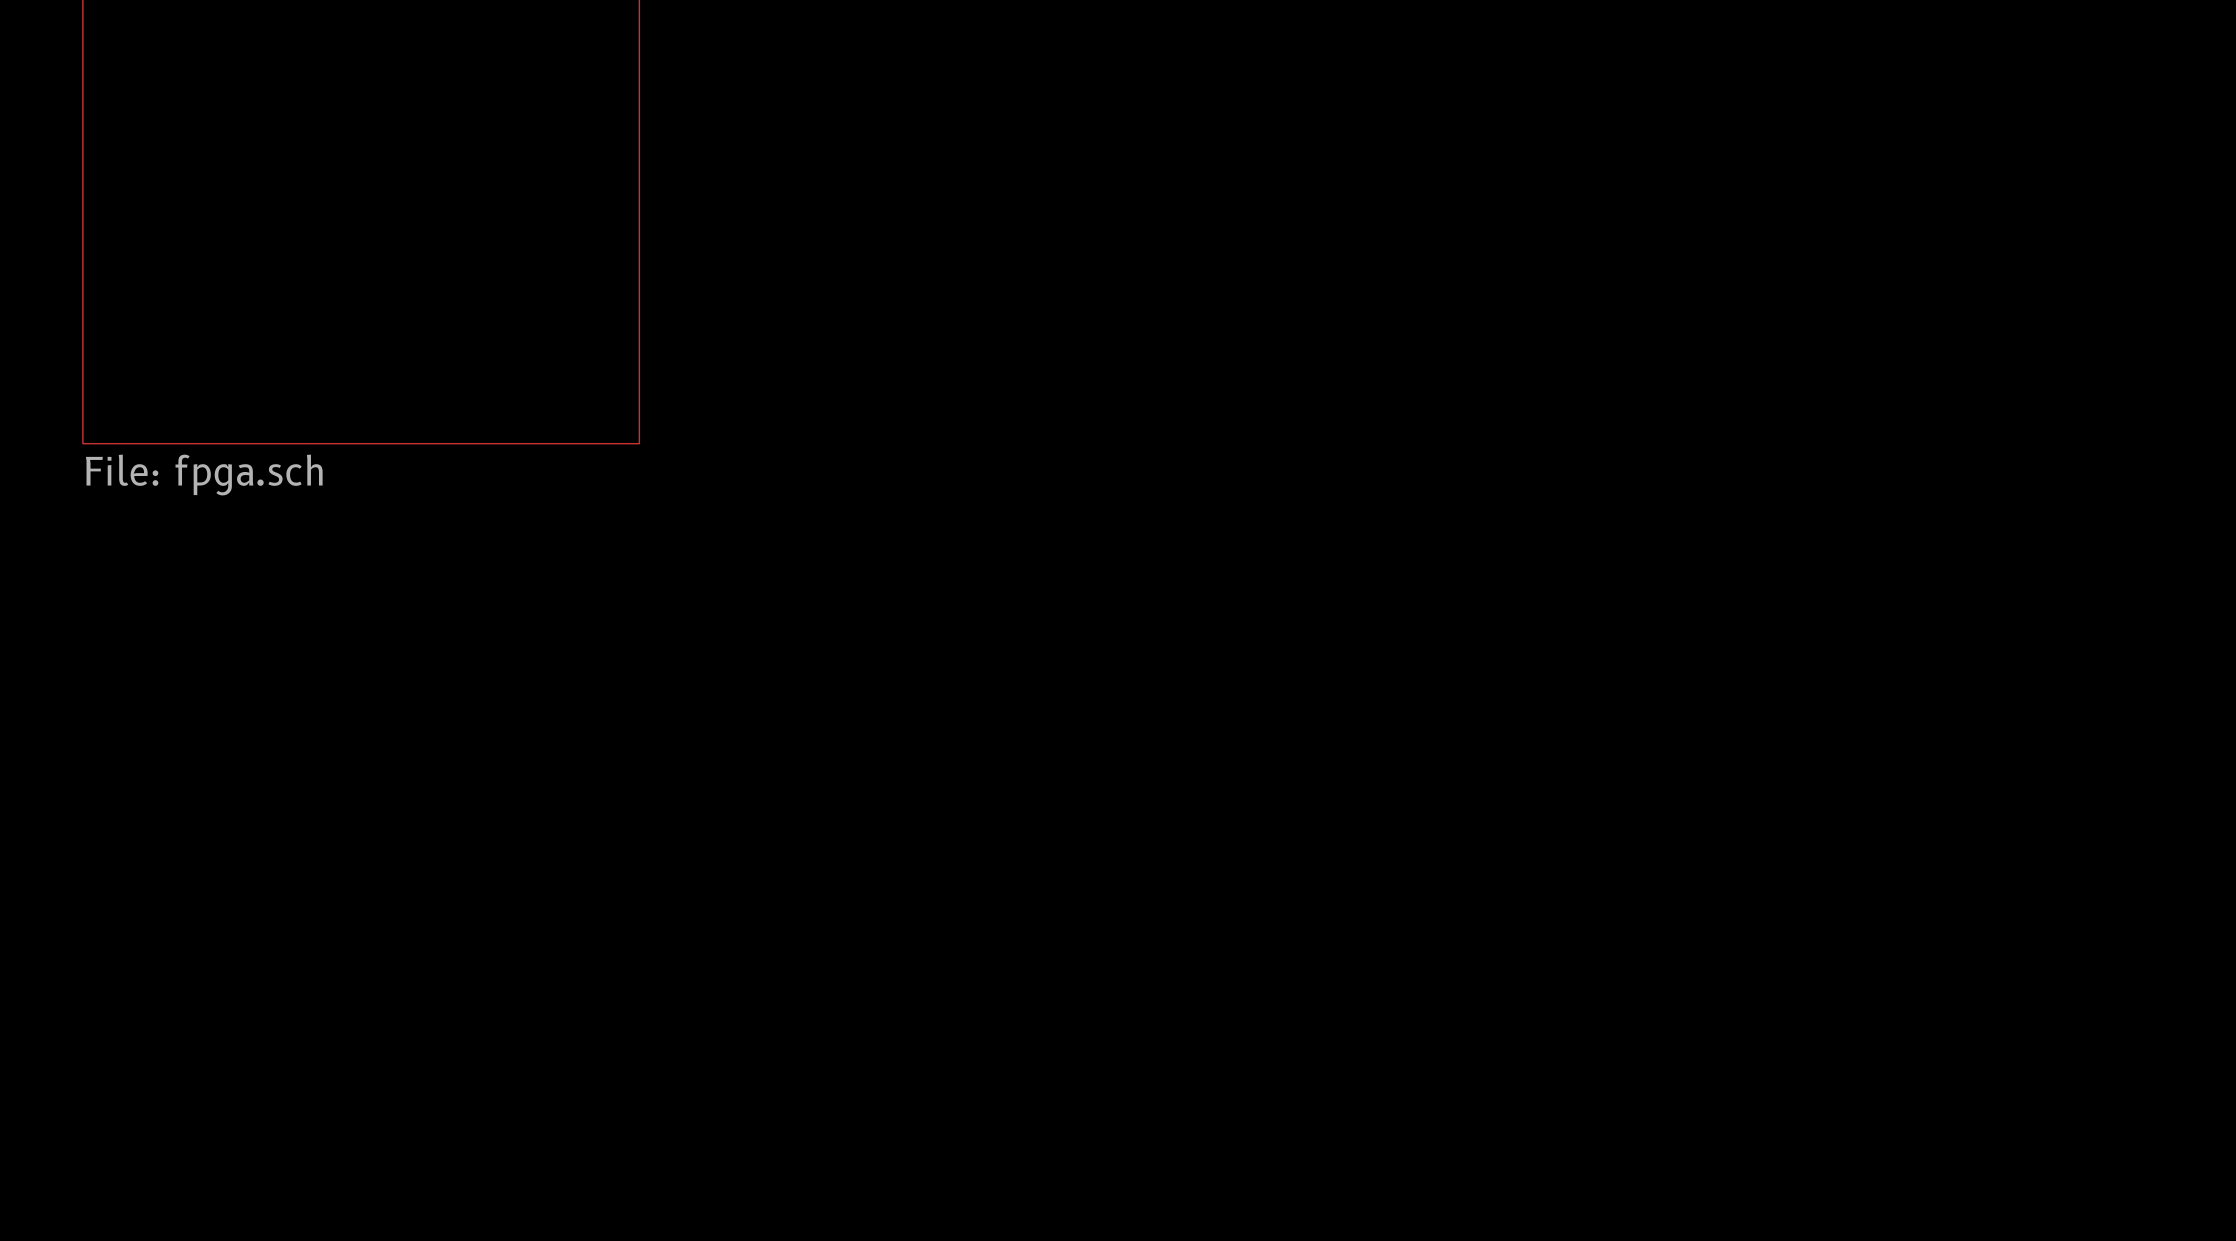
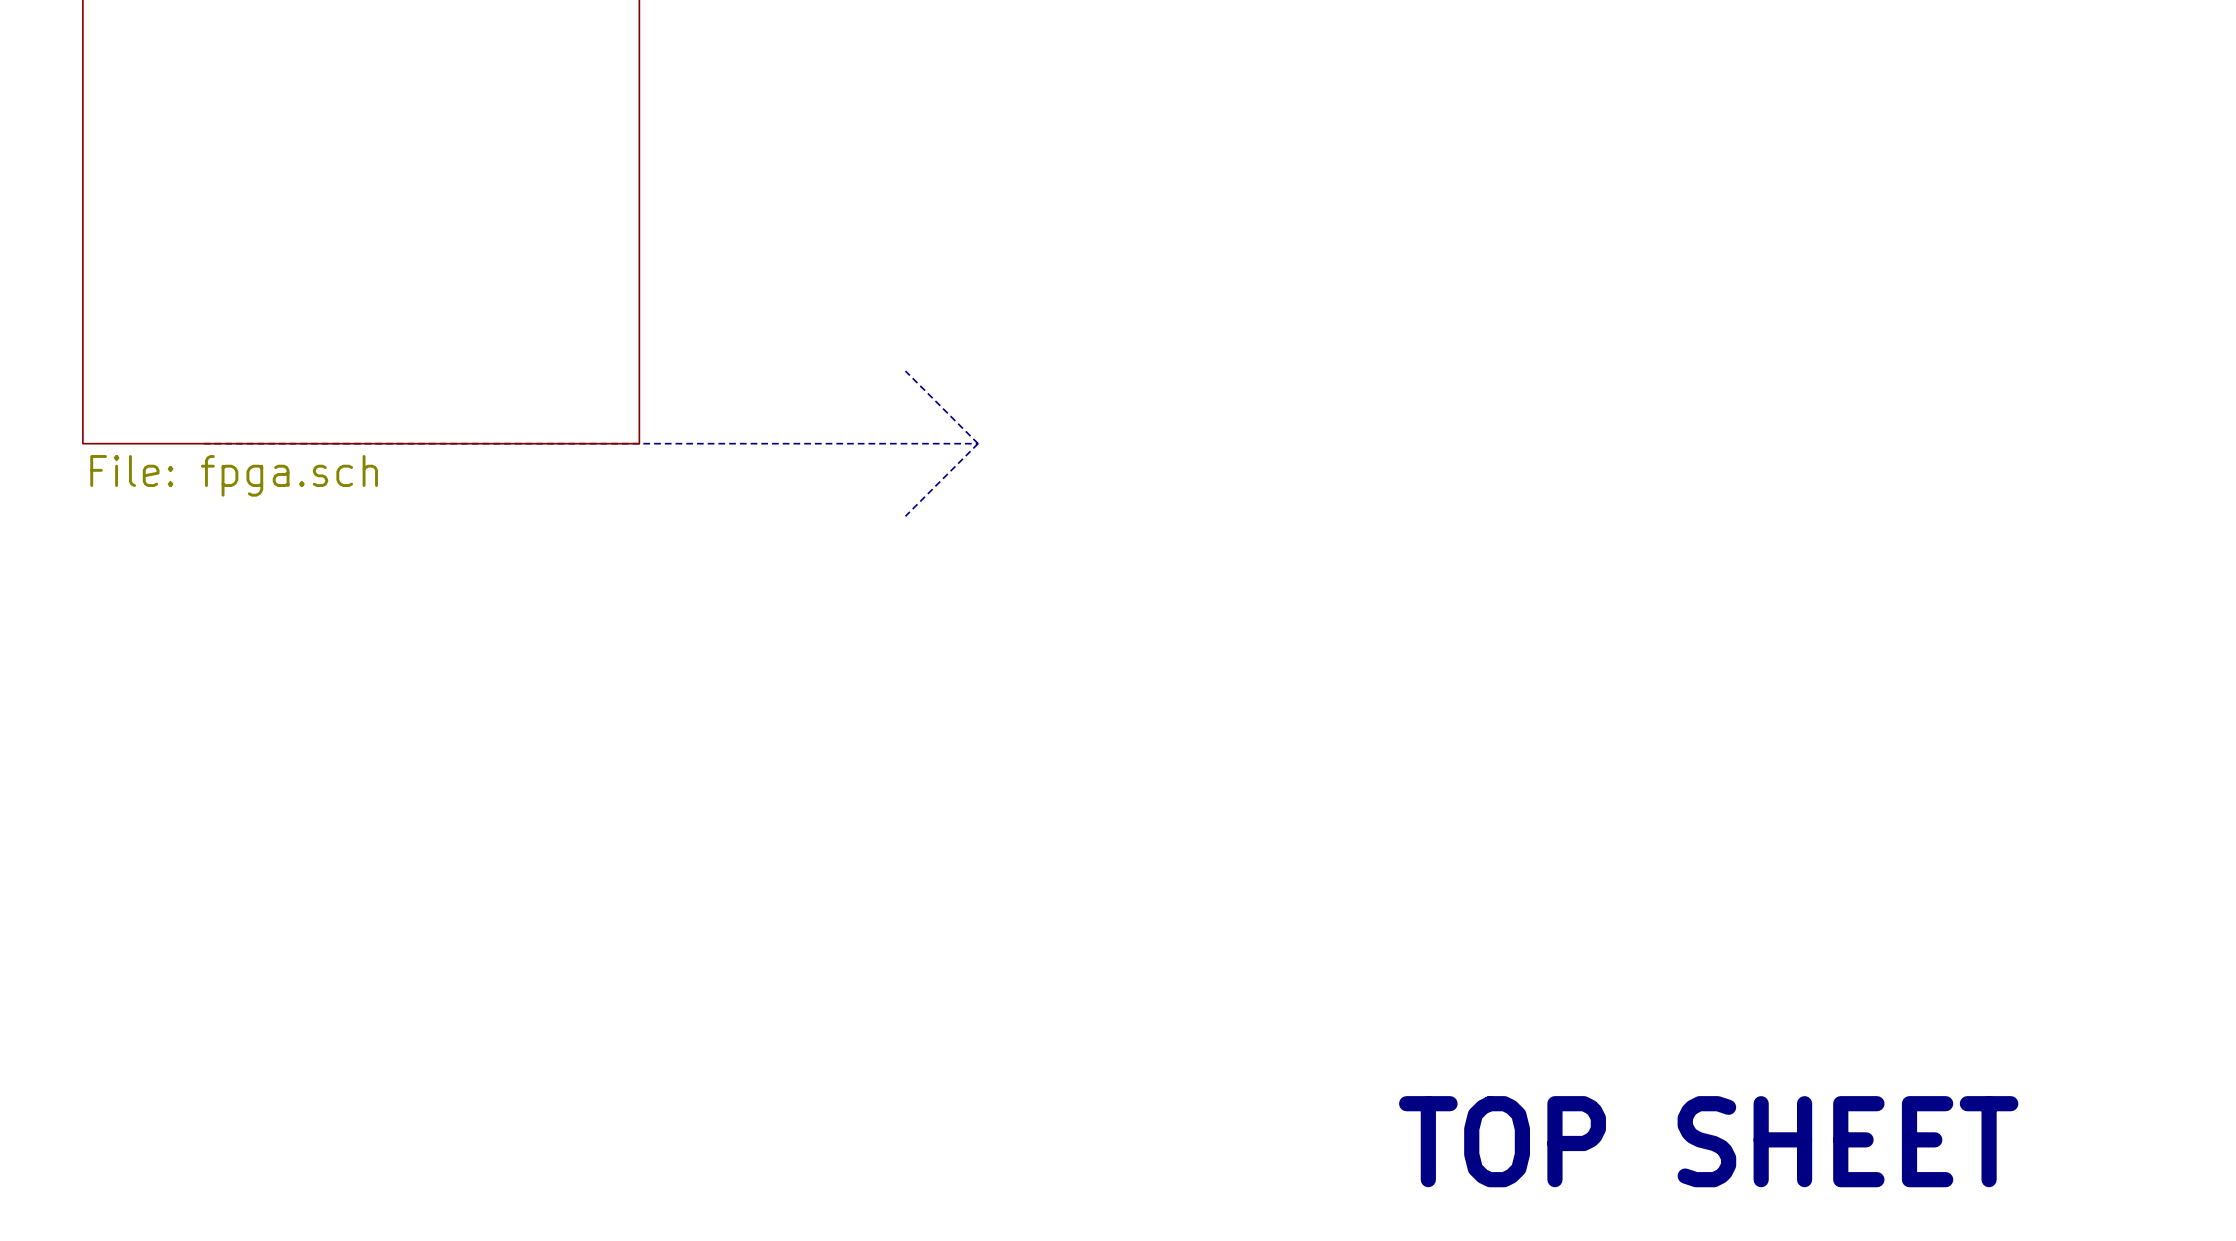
line: none -> (905, 371) (978, 443)
line: none -> (203, 443) (978, 443)
line: none -> (978, 443) (905, 516)
text: none -> TOP SHEET (1708, 1141)

